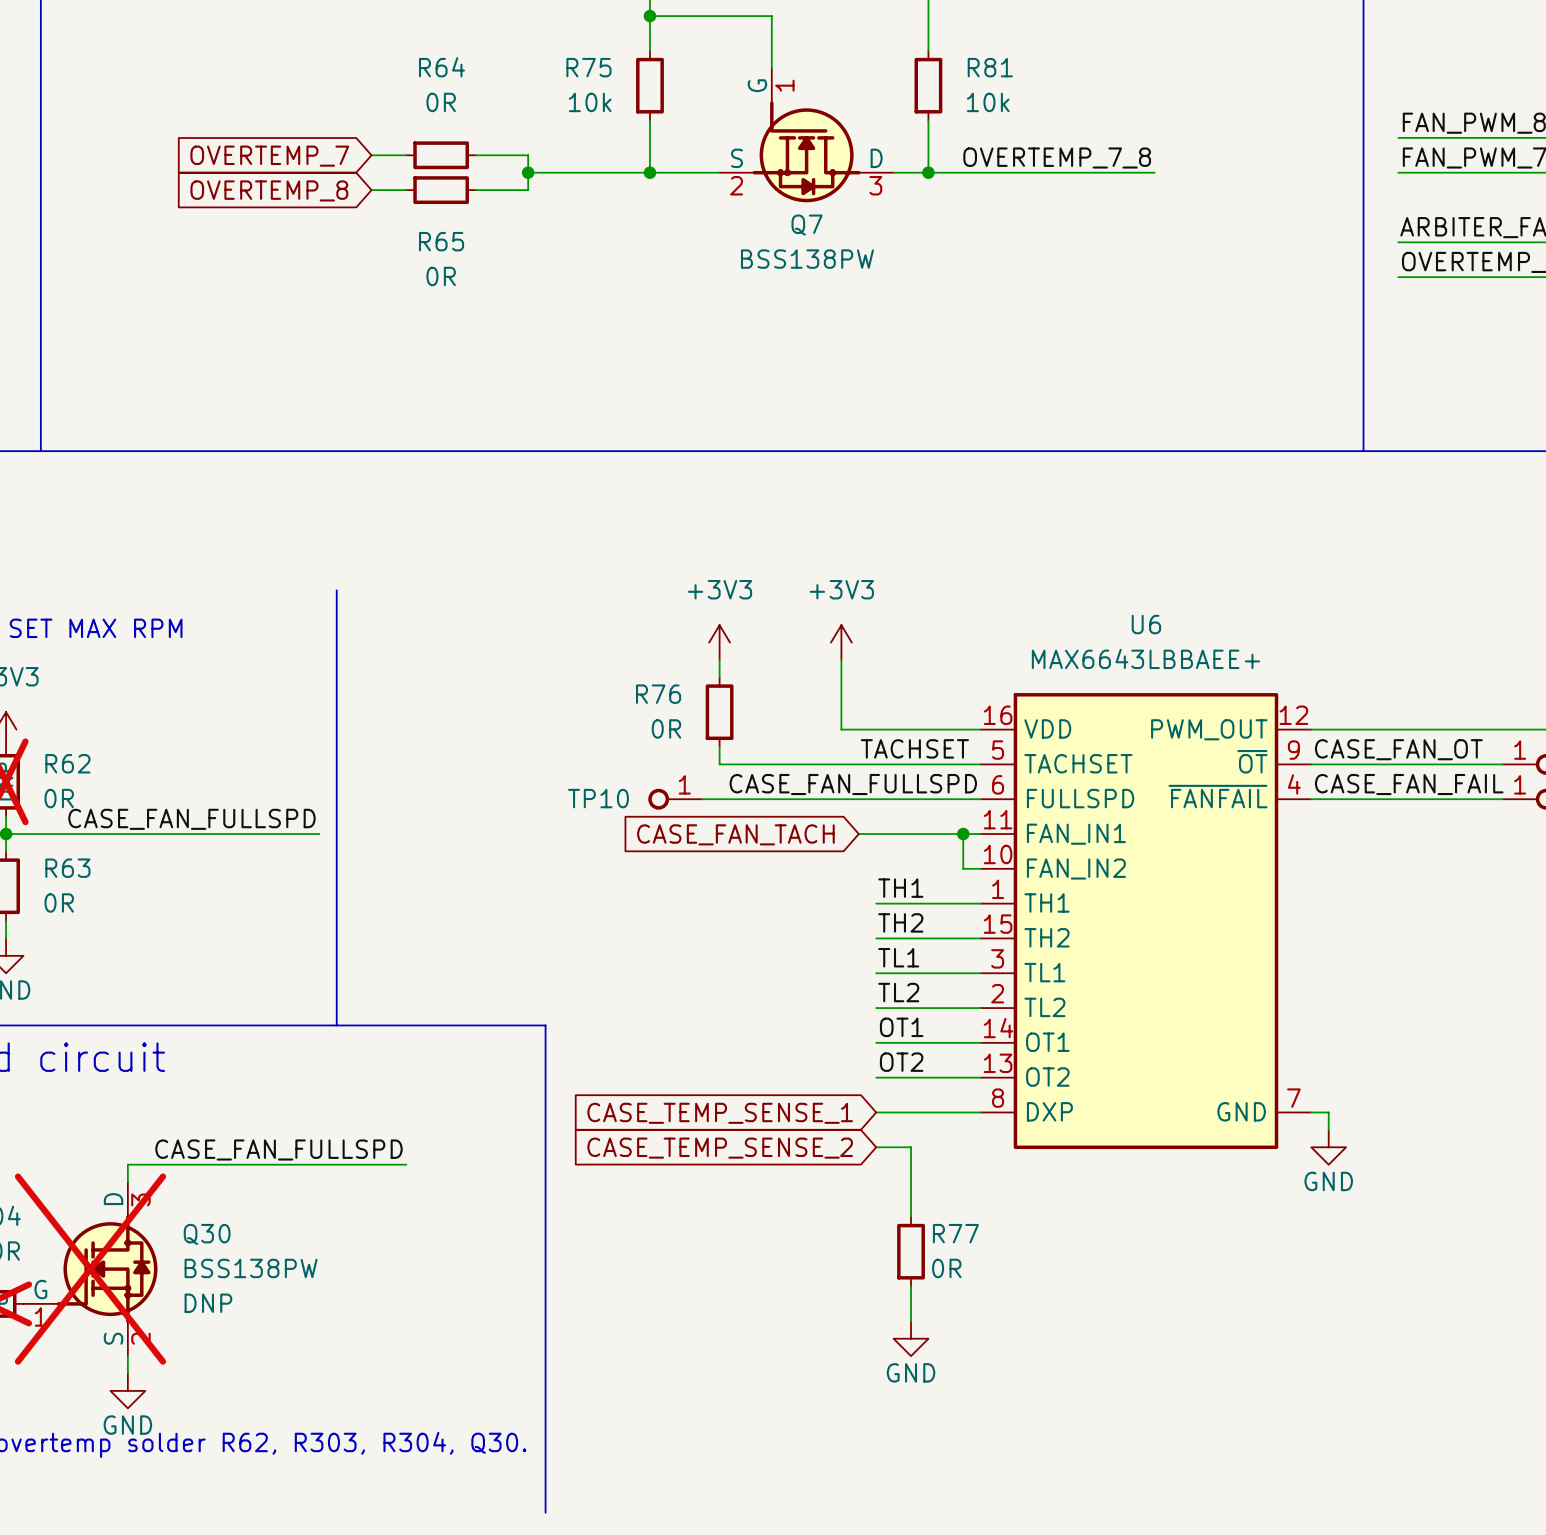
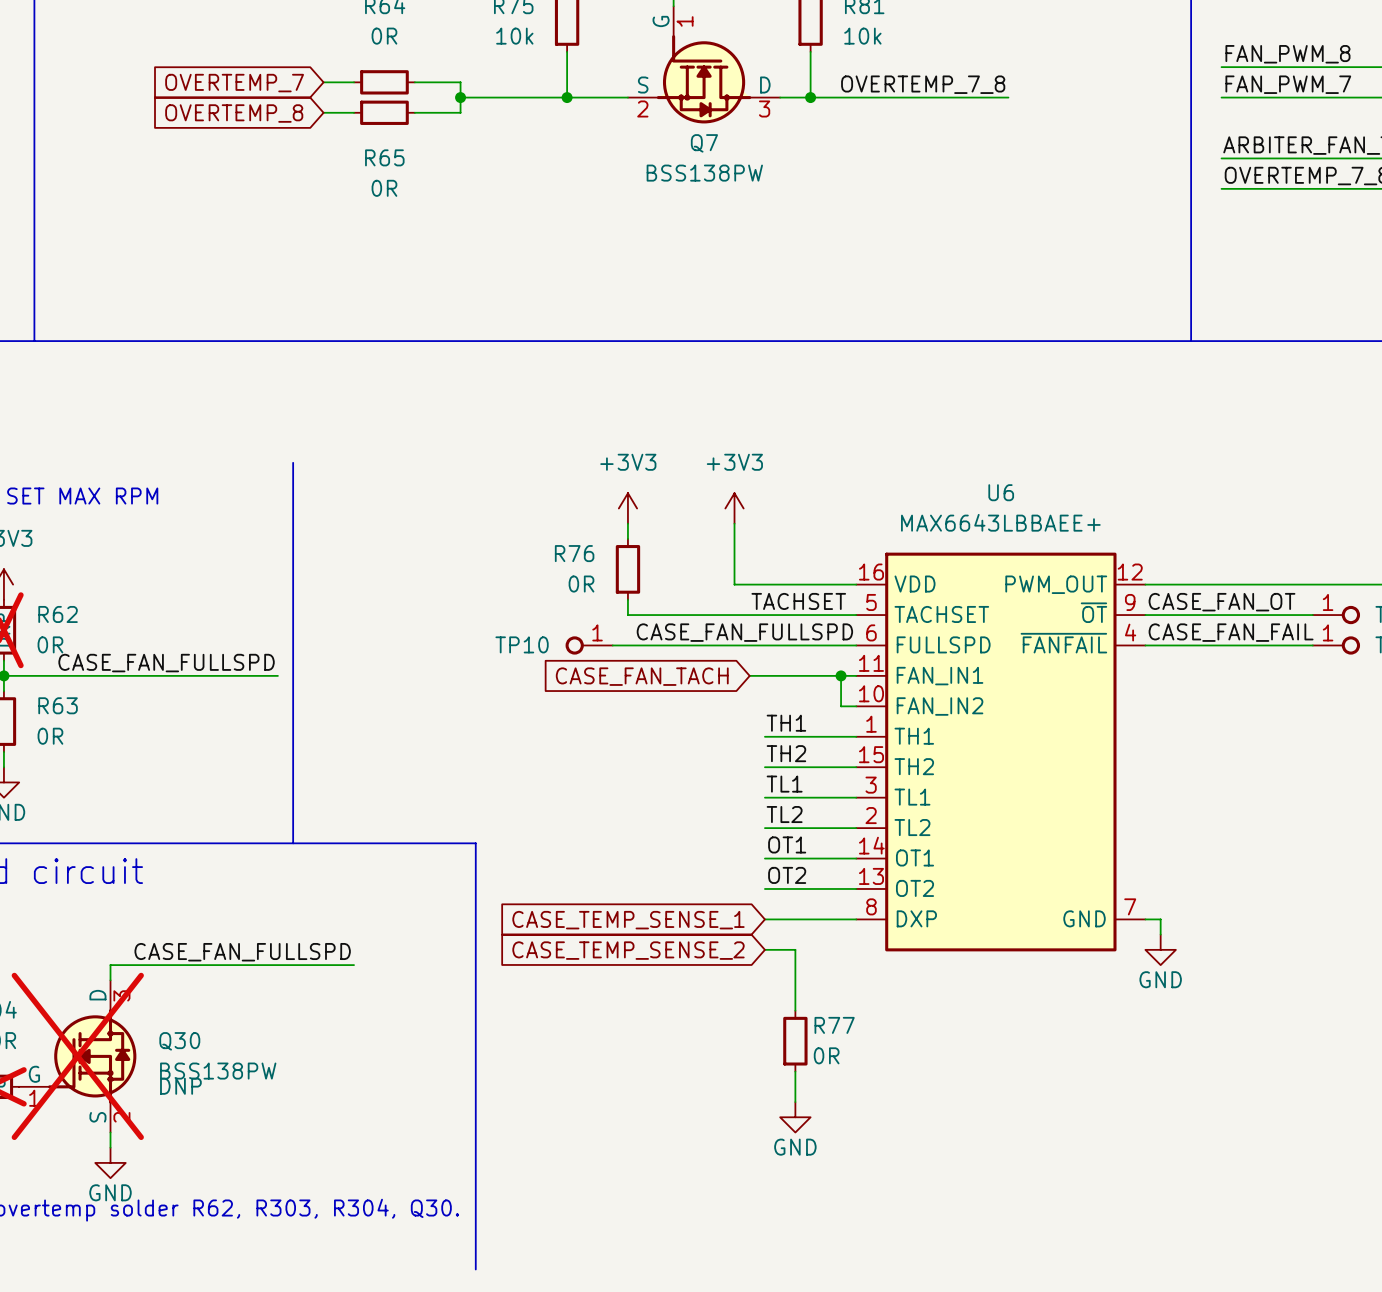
Q30 name position: Q30 (207, 1234) -> Q30 (179, 1041)
Q30 text position: BSS138PW (251, 1268) -> BSS138PW (218, 1071)

